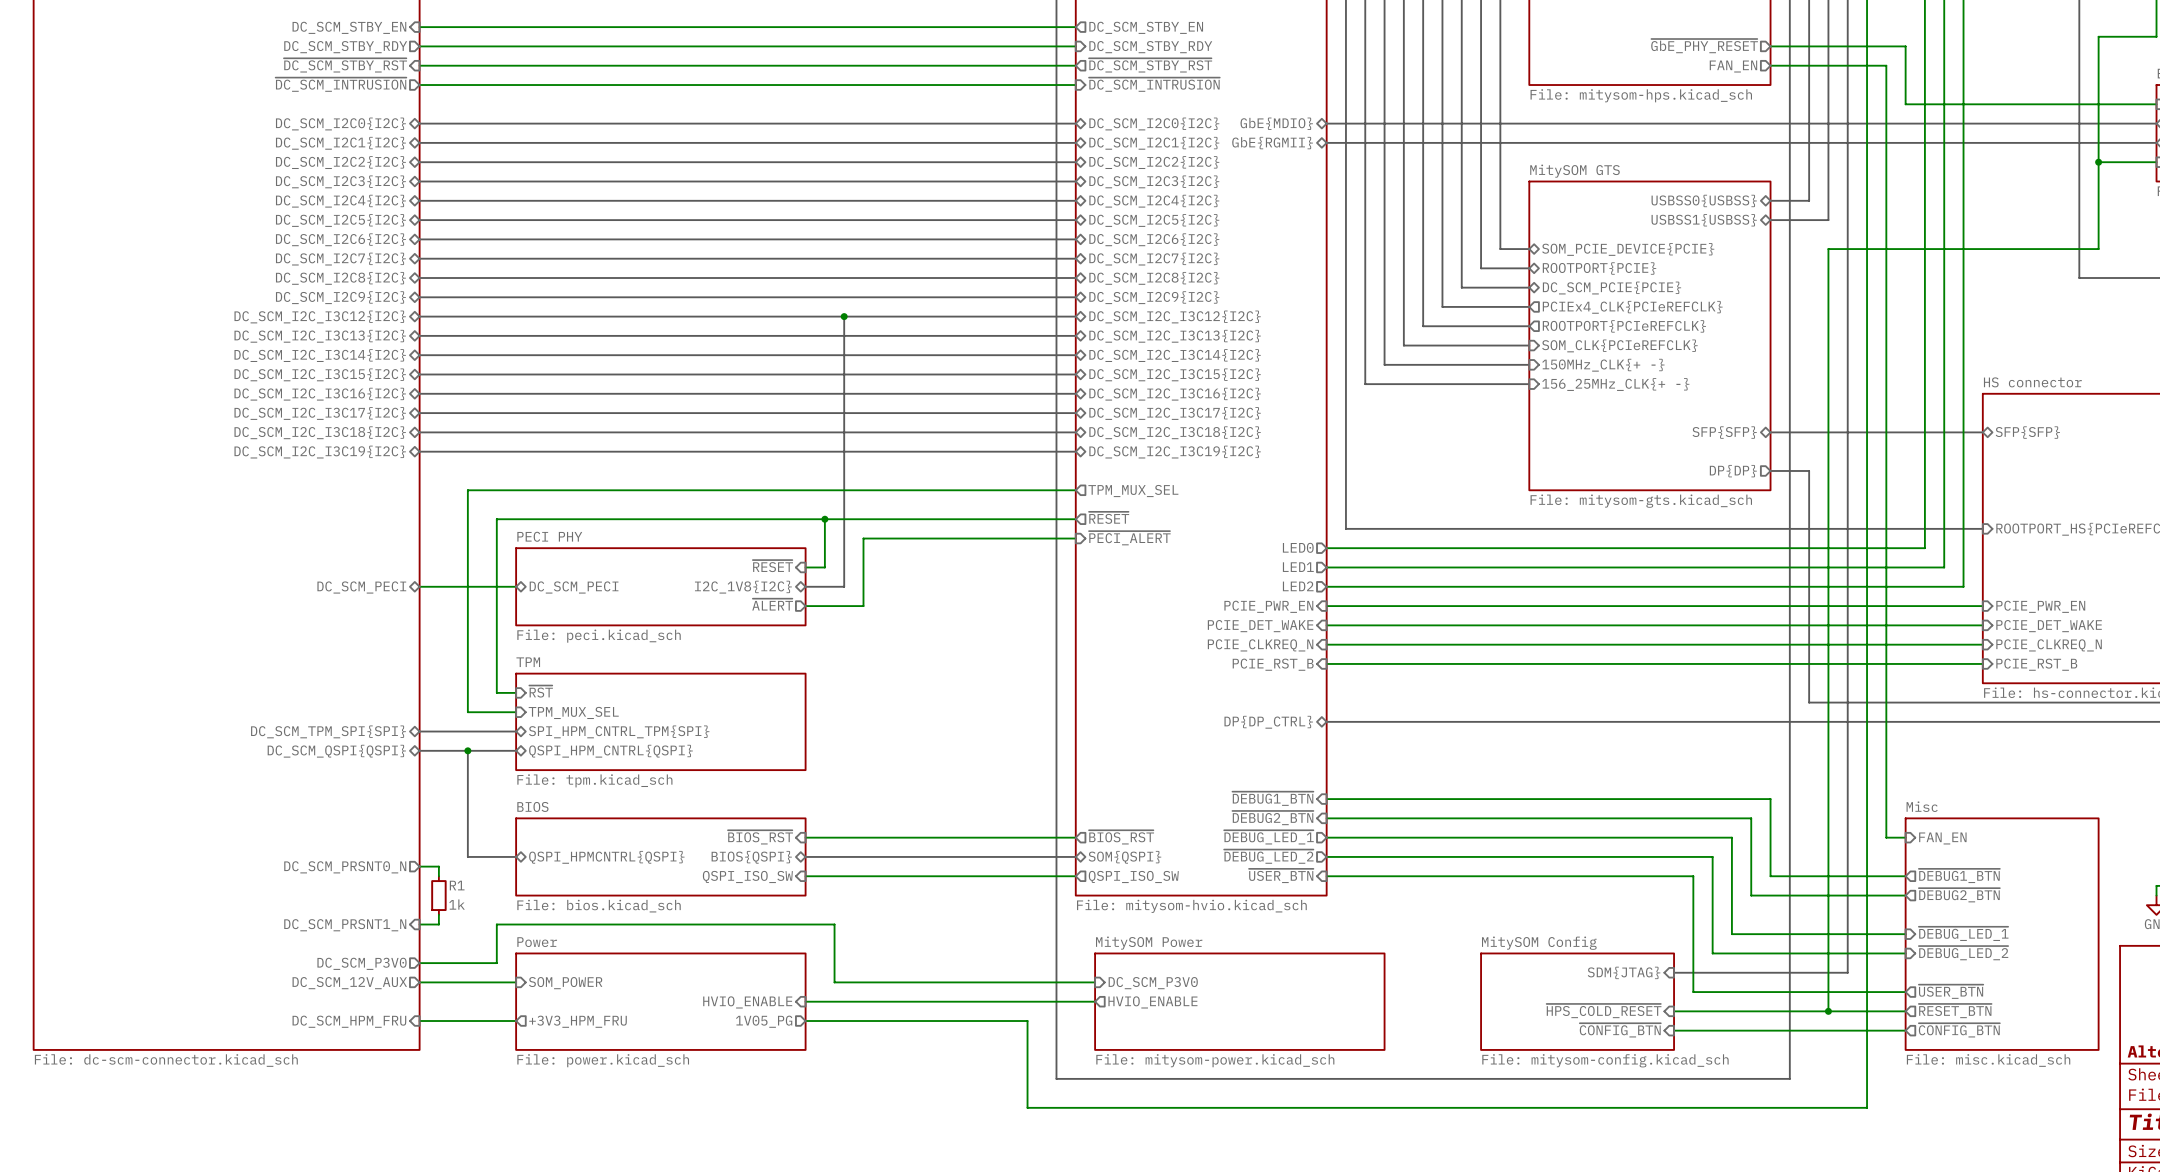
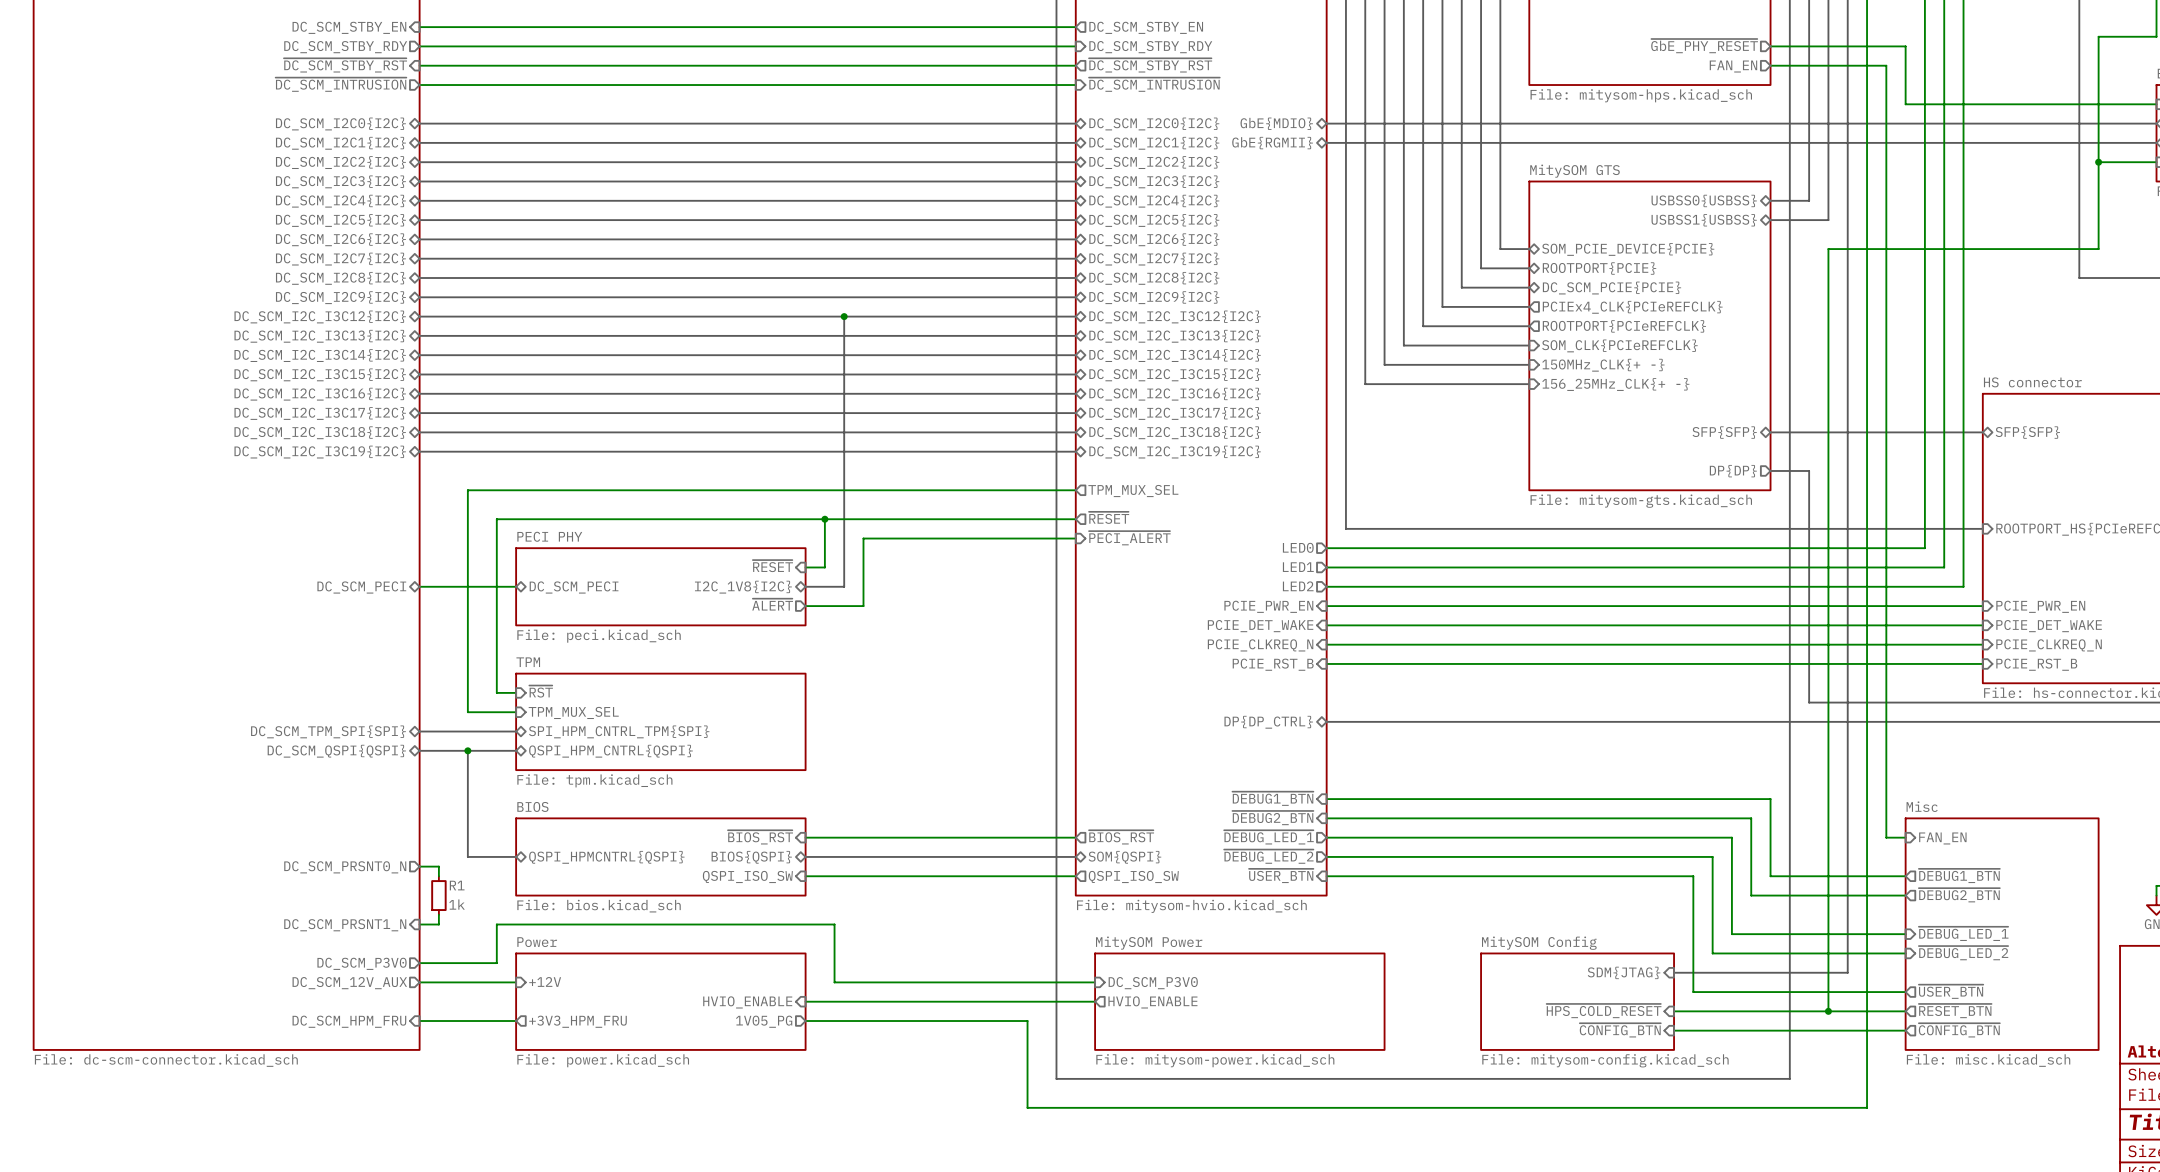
sheet pin: SOM_POWER (565, 983) -> +12V (545, 981)

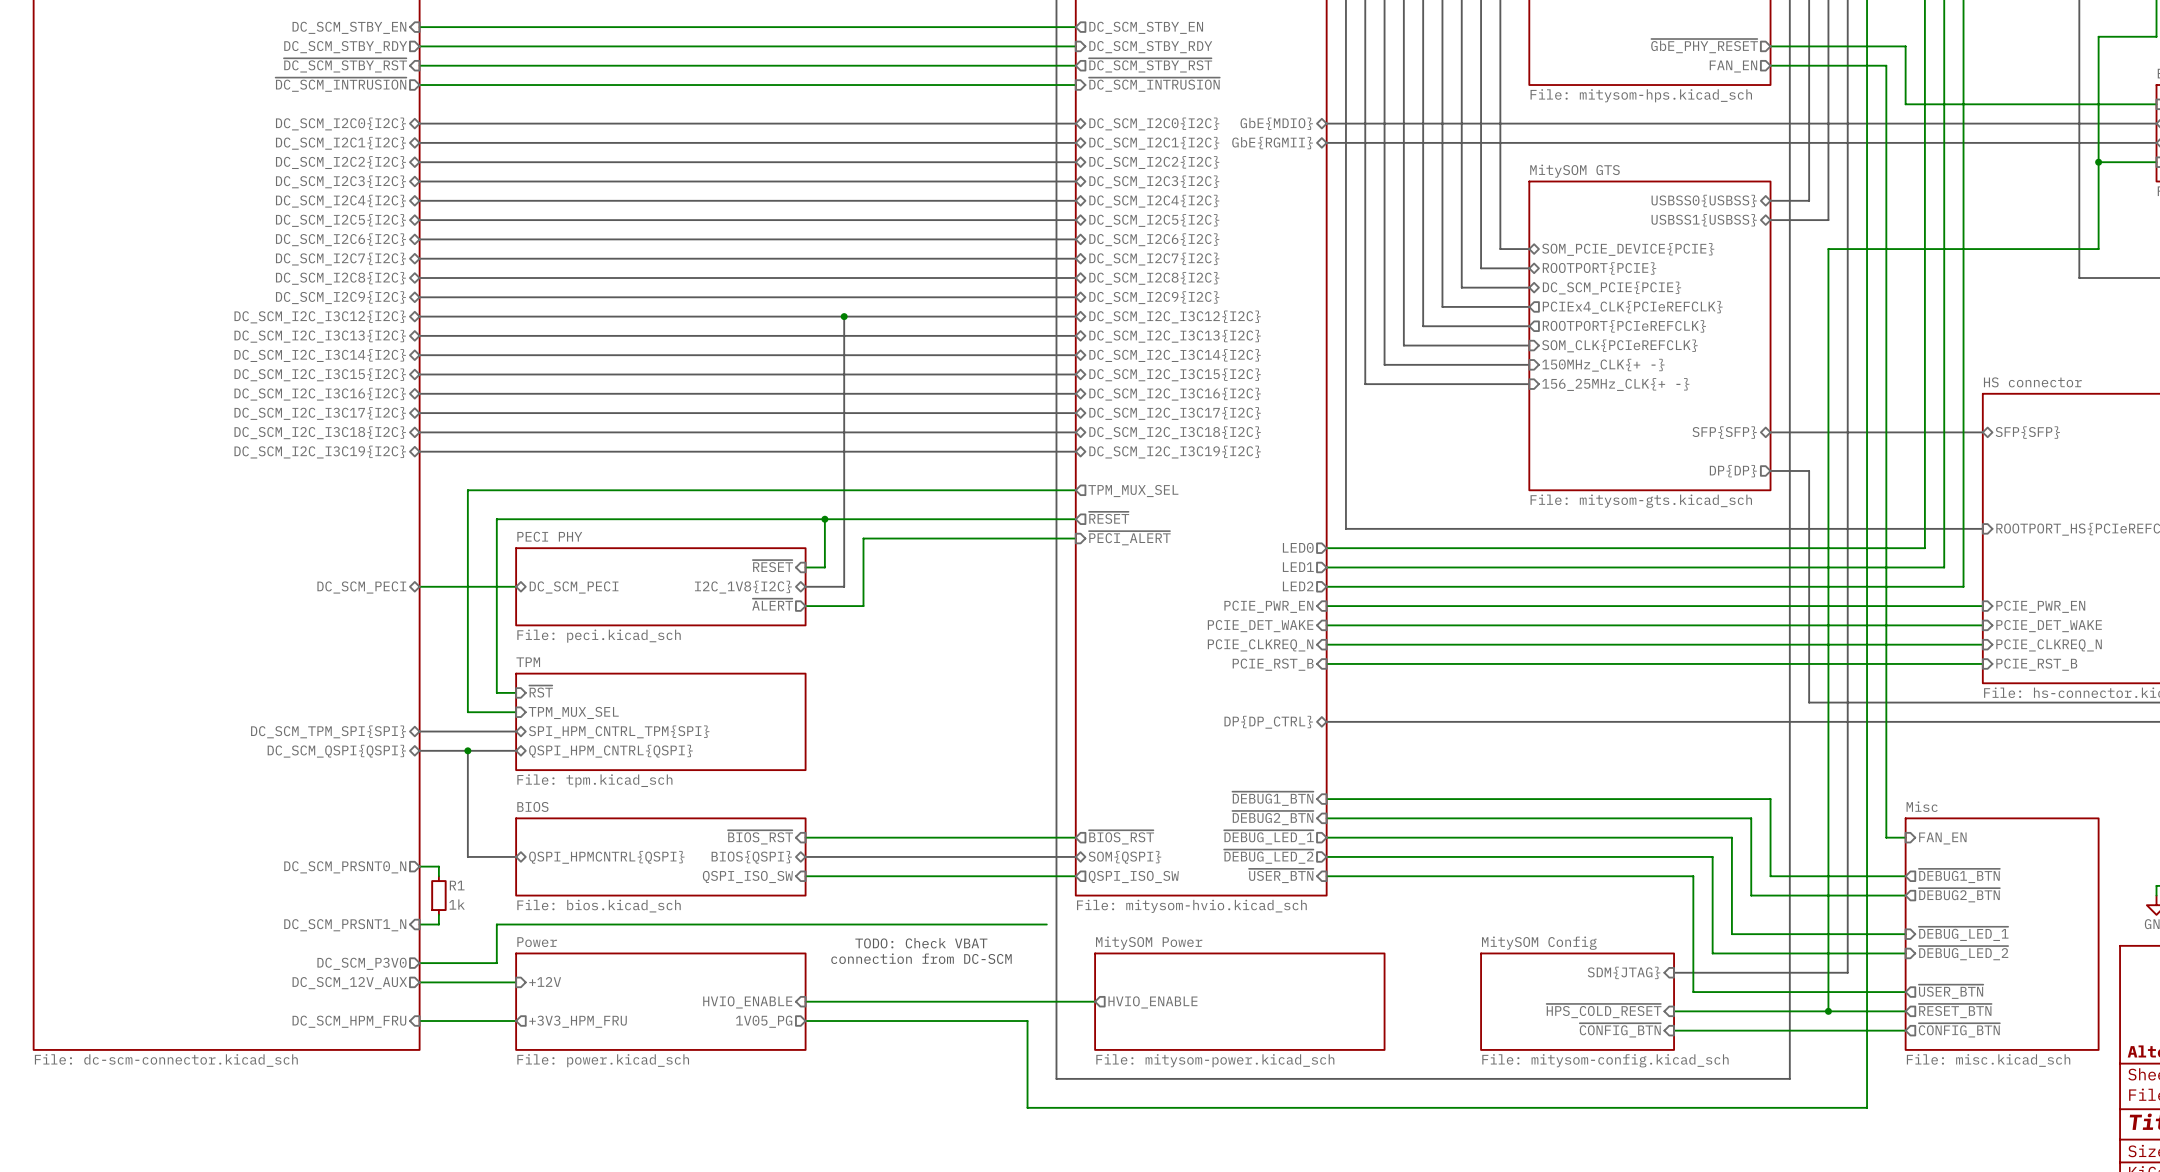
wire: (834, 924) (834, 982) (1095, 982) -> (834, 924) (1046, 924)
text: none -> TODO: Check VBAT (921, 943)
text: none -> connection from DC-SCM (921, 958)
sheet pin: DC_SCM_P3V0 (1153, 983) -> none

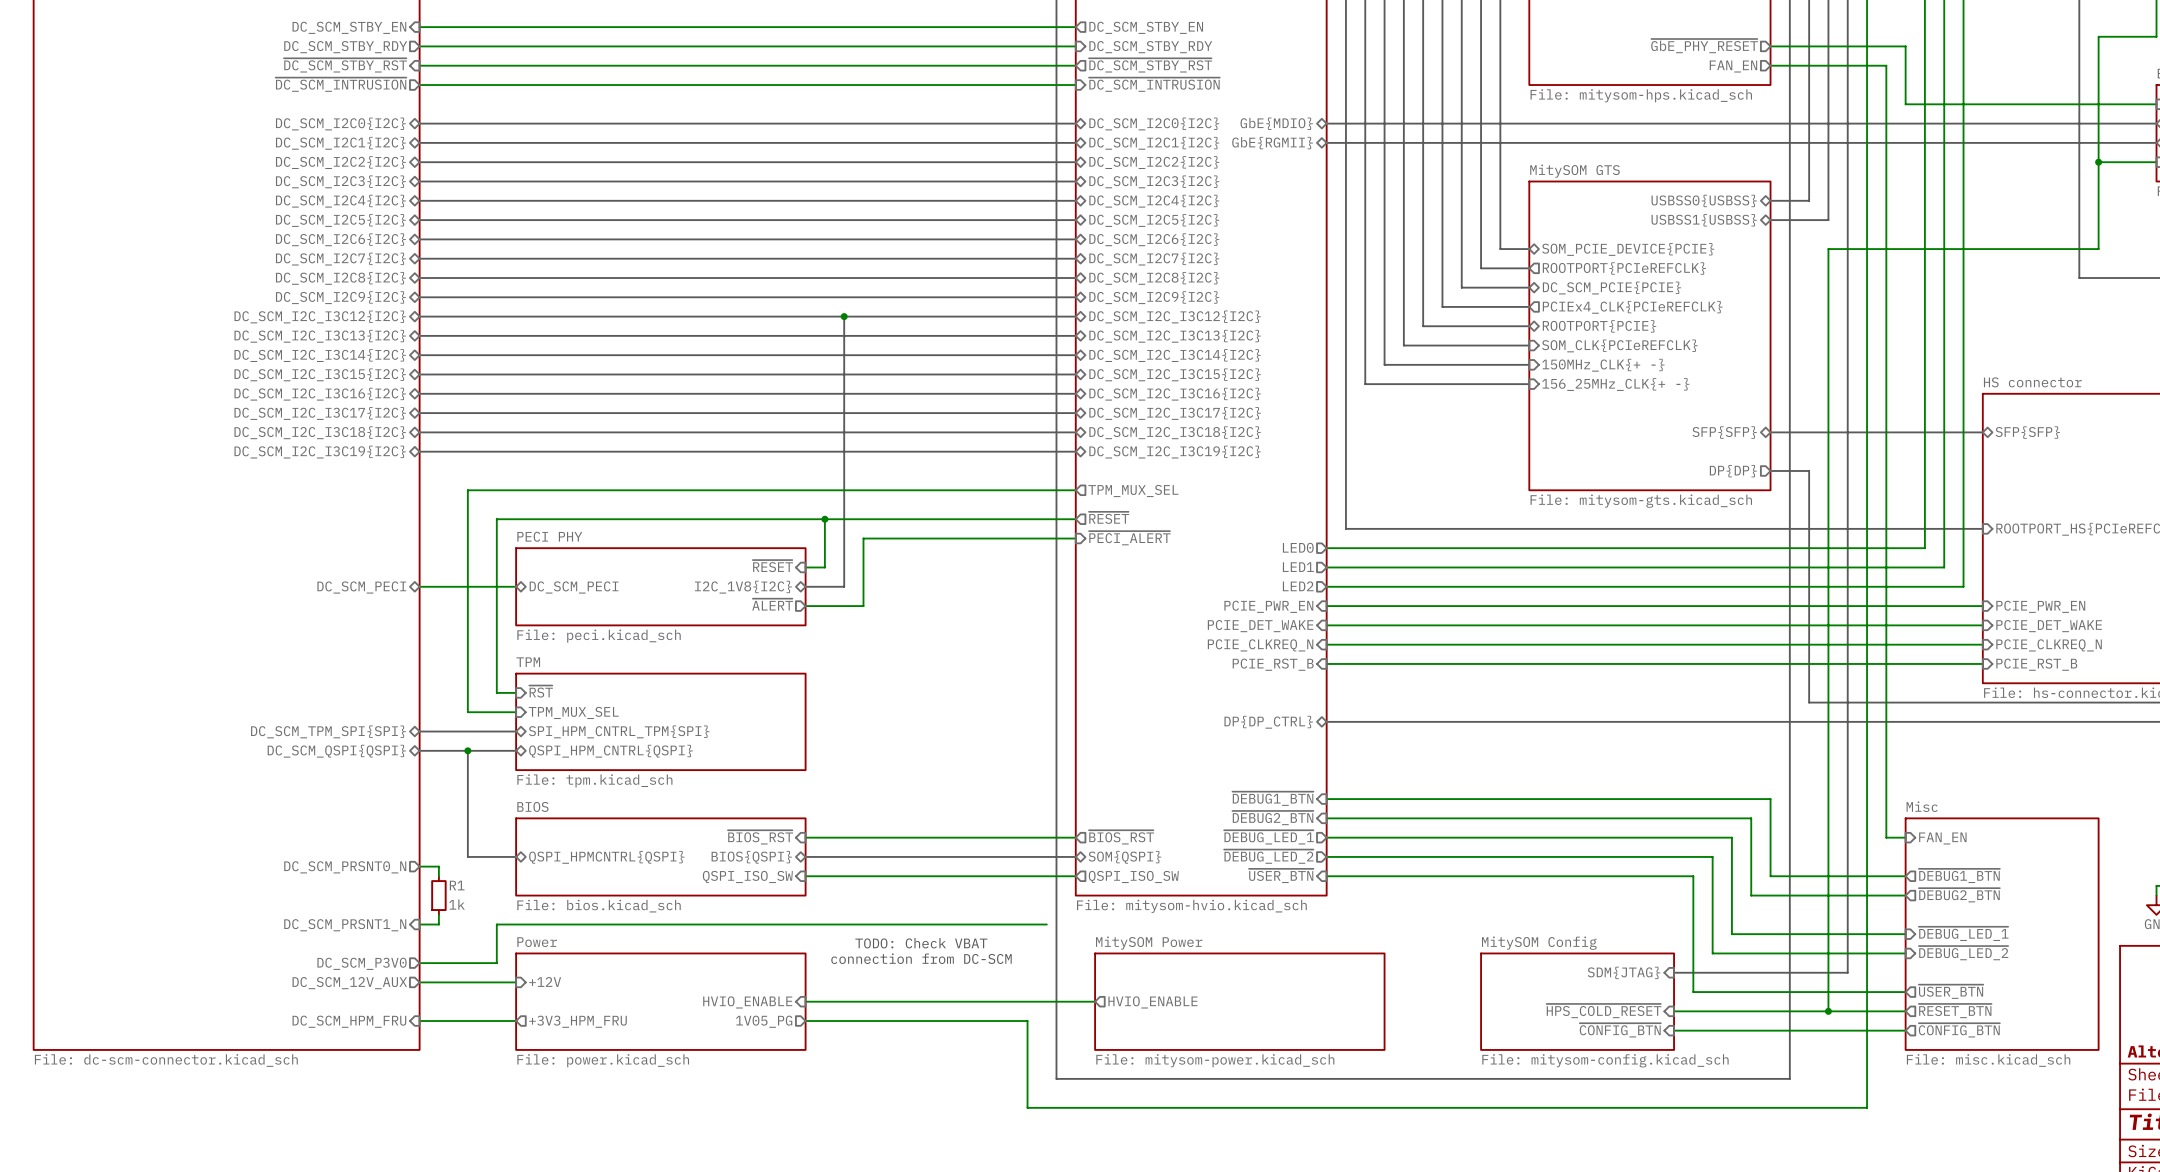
sheet pin shape: bidirectional (1599, 268) -> output (1624, 268)
sheet pin: ROOTPORT{PCIE} (1599, 268) -> ROOTPORT{PCIeREFCLK} (1624, 268)
sheet pin shape: output (1624, 326) -> bidirectional (1599, 326)
sheet pin: ROOTPORT{PCIeREFCLK} (1624, 326) -> ROOTPORT{PCIE} (1599, 326)

